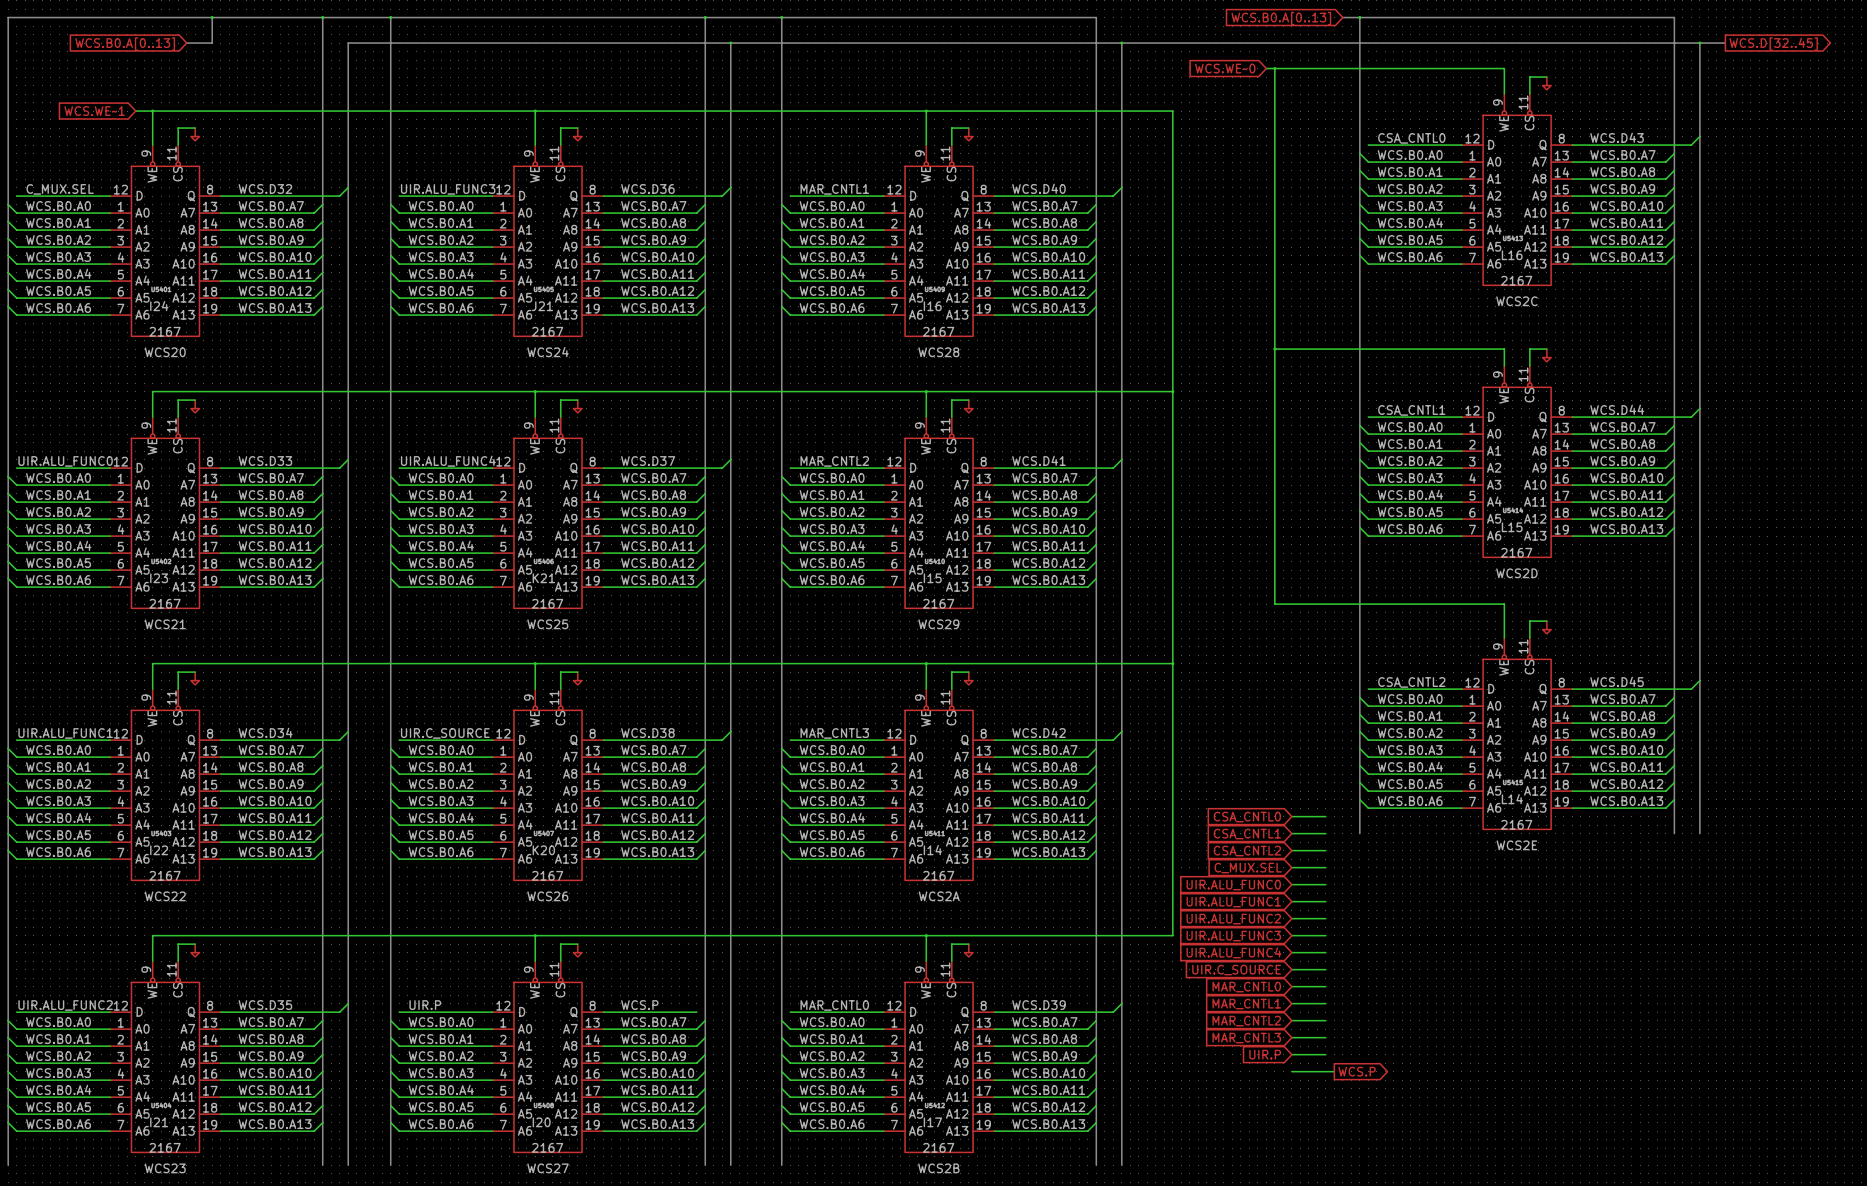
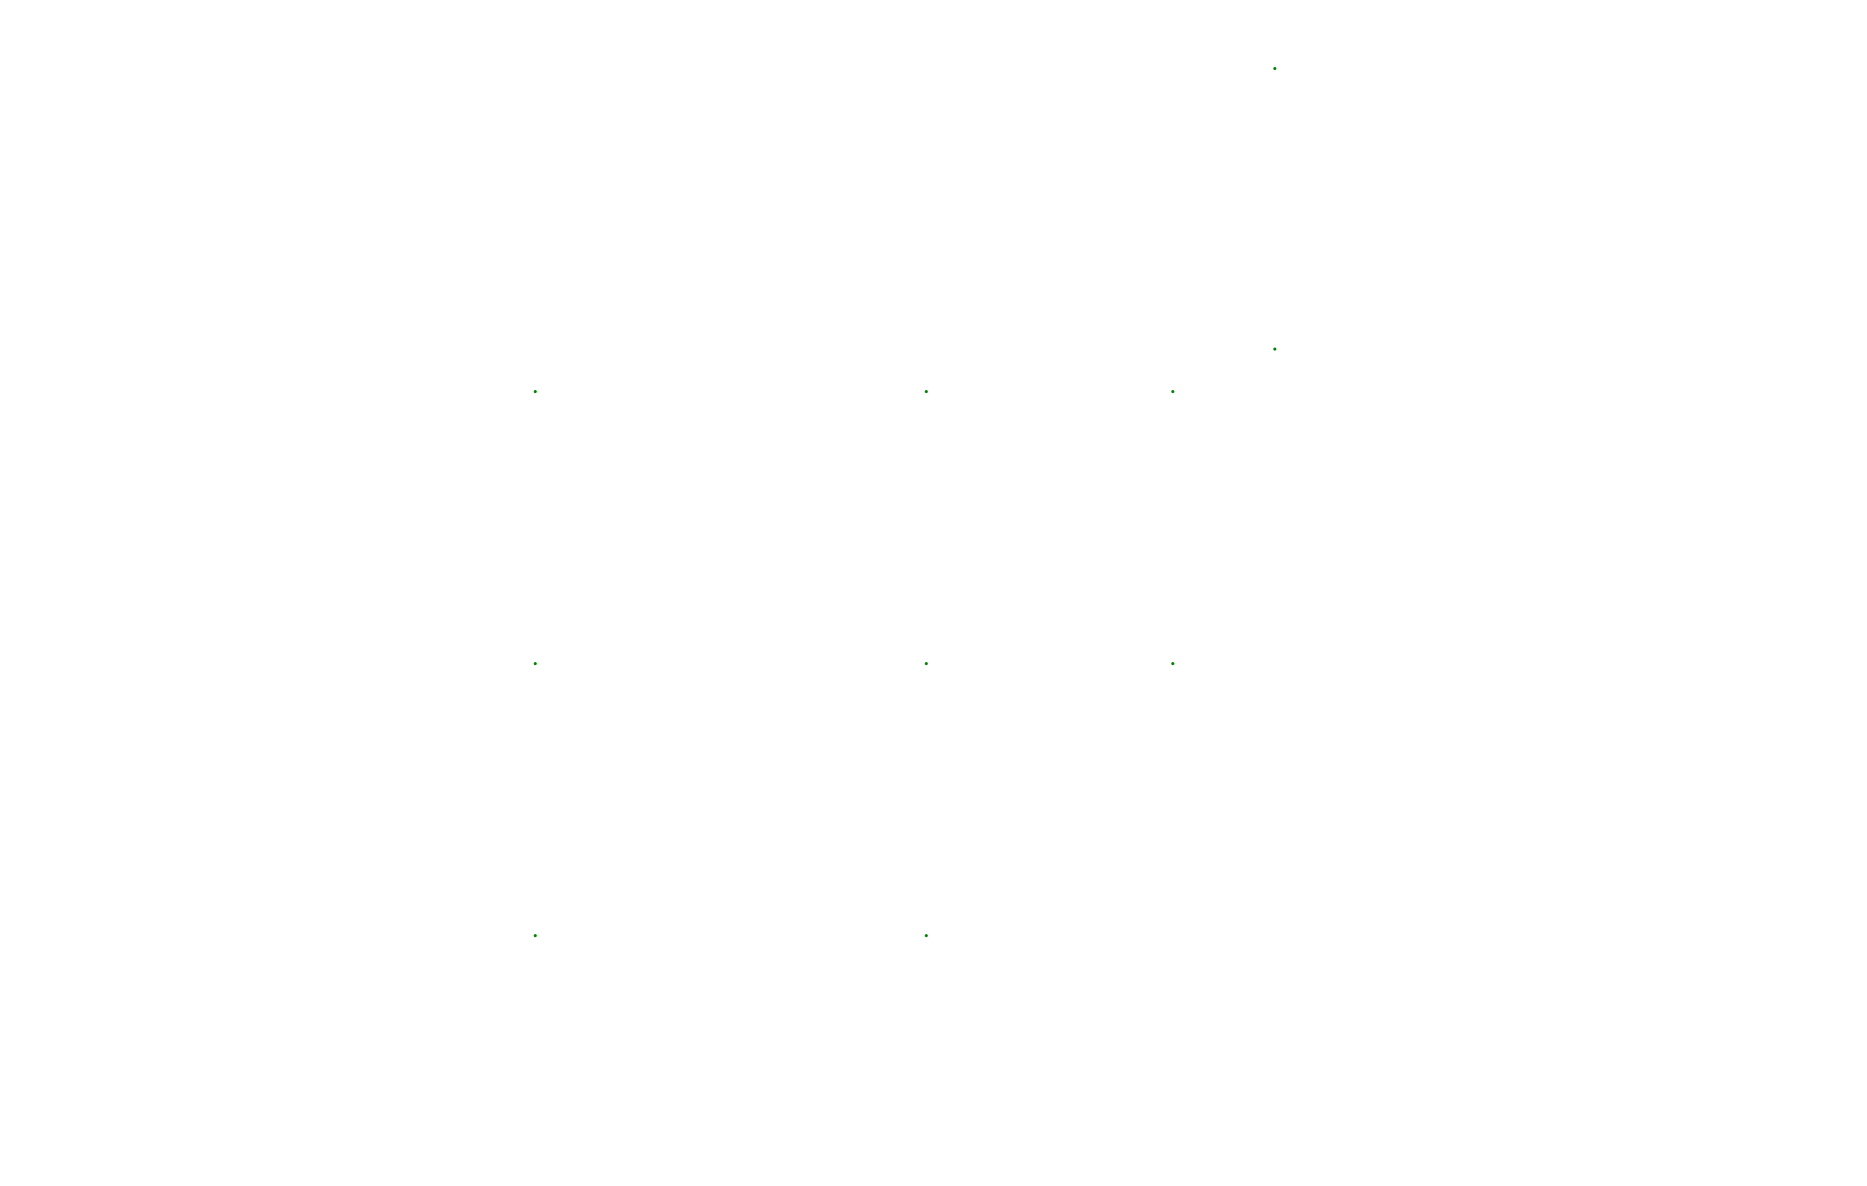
bus: (212, 17) (212, 43) (186, 43) -> none
junction: (212, 17) -> none
bus: (322, 17) (322, 1165) -> none
junction: (322, 17) -> none
bus: (390, 17) (390, 1165) -> none
junction: (390, 17) -> none
bus: (705, 17) (705, 1165) -> none
junction: (705, 17) -> none
bus: (781, 17) (781, 1165) -> none
junction: (781, 17) -> none
bus: (1342, 17) (1674, 17) (1674, 833) -> none
bus: (1359, 17) (1359, 833) -> none
junction: (1359, 17) -> none
global label: WCS.B0.A[0..13] (1281, 18) -> none
bus: (730, 43) (730, 1165) -> none
junction: (730, 43) -> none
bus: (1121, 43) (1121, 1165) -> none
junction: (1121, 43) -> none
bus: (1699, 43) (1699, 833) -> none
junction: (1699, 43) -> none
bus: (1725, 43) (348, 43) (348, 1165) -> none
global label: WCS.B0.A[0..13] (125, 44) -> none
global label: WCS.D[32..45] (1773, 44) -> none
global label: WCS.WE~0 (1225, 68) -> none
wire: (1266, 68) (1504, 68) (1504, 94) -> none
wire: (1274, 68) (1274, 604) (1504, 604) (1504, 638) -> none
wire: (1546, 77) (1529, 77) (1529, 94) -> none
power symbol: (1546, 83) -> none
global label: WCS.WE~1 (94, 111) -> none
wire: (135, 111) (1172, 111) (1172, 935) (152, 935) (152, 961) -> none
wire: (152, 111) (152, 145) -> none
wire: (535, 111) (535, 145) -> none
wire: (926, 111) (926, 145) -> none
wire: (195, 128) (178, 128) (178, 145) -> none
wire: (577, 128) (560, 128) (560, 145) -> none
wire: (968, 128) (951, 128) (951, 145) -> none
power symbol: (195, 134) -> none
power symbol: (577, 134) -> none
power symbol: (968, 134) -> none
wire: (1699, 136) (1691, 145) (1572, 145) -> none
label: WCS.D43 (1617, 137) -> none
label: CSA_CNTL0 (1411, 138) -> none
wire: (1368, 145) (1461, 145) -> none
wire: (1359, 153) (1368, 162) (1461, 162) -> none
wire: (1674, 153) (1665, 162) (1572, 162) -> none
label: WCS.B0.A0 (1410, 154) -> none
label: WCS.B0.A7 (1622, 154) -> none
wire: (1359, 170) (1368, 179) (1461, 179) -> none
wire: (1674, 170) (1665, 179) (1572, 179) -> none
label: WCS.B0.A1 (1410, 171) -> none
label: WCS.B0.A8 (1622, 171) -> none
wire: (348, 187) (339, 196) (220, 196) -> none
wire: (730, 187) (722, 196) (603, 196) -> none
wire: (1121, 187) (1113, 196) (994, 196) -> none
wire: (1359, 187) (1368, 196) (1461, 196) -> none
wire: (1674, 187) (1665, 196) (1572, 196) -> none
label: WCS.D32 (265, 188) -> none
label: WCS.D36 (647, 188) -> none
label: WCS.D40 (1038, 188) -> none
label: WCS.B0.A2 (1410, 188) -> none
label: WCS.B0.A9 (1622, 188) -> none
label: C_MUX.SEL (60, 189) -> none
label: UIR.ALU_FUNC3 (448, 189) -> none
label: MAR_CNTL1 (834, 189) -> none
part: 2167 (1517, 189) -> none
wire: (16, 196) (110, 196) -> none
wire: (399, 196) (492, 196) -> none
wire: (790, 196) (883, 196) -> none
wire: (8, 204) (16, 213) (110, 213) -> none
wire: (322, 204) (314, 213) (220, 213) -> none
wire: (390, 204) (399, 213) (492, 213) -> none
wire: (705, 204) (696, 213) (603, 213) -> none
wire: (781, 204) (790, 213) (883, 213) -> none
wire: (1096, 204) (1087, 213) (994, 213) -> none
wire: (1359, 204) (1368, 213) (1461, 213) -> none
wire: (1674, 204) (1665, 213) (1572, 213) -> none
label: WCS.B0.A0 (58, 205) -> none
label: WCS.B0.A7 (271, 205) -> none
label: WCS.B0.A0 (441, 205) -> none
label: WCS.B0.A7 (653, 205) -> none
label: WCS.B0.A0 (832, 205) -> none
label: WCS.B0.A7 (1044, 205) -> none
label: WCS.B0.A3 (1410, 205) -> none
label: WCS.B0.A10 (1626, 205) -> none
wire: (8, 221) (16, 230) (110, 230) -> none
wire: (322, 221) (314, 230) (220, 230) -> none
wire: (390, 221) (399, 230) (492, 230) -> none
wire: (705, 221) (696, 230) (603, 230) -> none
wire: (781, 221) (790, 230) (883, 230) -> none
wire: (1096, 221) (1087, 230) (994, 230) -> none
wire: (1359, 221) (1368, 230) (1461, 230) -> none
wire: (1674, 221) (1665, 230) (1572, 230) -> none
label: WCS.B0.A1 (58, 222) -> none
label: WCS.B0.A8 (271, 222) -> none
label: WCS.B0.A1 (441, 222) -> none
label: WCS.B0.A8 (653, 222) -> none
label: WCS.B0.A1 (832, 222) -> none
label: WCS.B0.A8 (1044, 222) -> none
label: WCS.B0.A4 (1410, 222) -> none
label: WCS.B0.A11 (1626, 222) -> none
wire: (8, 238) (16, 247) (110, 247) -> none
wire: (322, 238) (314, 247) (220, 247) -> none
wire: (390, 238) (399, 247) (492, 247) -> none
wire: (705, 238) (696, 247) (603, 247) -> none
wire: (781, 238) (790, 247) (883, 247) -> none
wire: (1096, 238) (1087, 247) (994, 247) -> none
wire: (1359, 238) (1368, 247) (1461, 247) -> none
wire: (1674, 238) (1665, 247) (1572, 247) -> none
label: WCS.B0.A2 (58, 239) -> none
label: WCS.B0.A9 (271, 239) -> none
label: WCS.B0.A2 (441, 239) -> none
label: WCS.B0.A9 (653, 239) -> none
label: WCS.B0.A2 (832, 239) -> none
label: WCS.B0.A9 (1044, 239) -> none
label: WCS.B0.A5 (1410, 239) -> none
label: WCS.B0.A12 (1626, 239) -> none
part: 2167 (165, 240) -> none
part: 2167 (548, 240) -> none
part: 2167 (939, 240) -> none
wire: (8, 255) (16, 264) (110, 264) -> none
wire: (322, 255) (314, 264) (220, 264) -> none
wire: (390, 255) (399, 264) (492, 264) -> none
wire: (705, 255) (696, 264) (603, 264) -> none
wire: (781, 255) (790, 264) (883, 264) -> none
wire: (1096, 255) (1087, 264) (994, 264) -> none
wire: (1359, 255) (1368, 264) (1461, 264) -> none
wire: (1674, 255) (1665, 264) (1572, 264) -> none
label: WCS.B0.A3 (58, 256) -> none
label: WCS.B0.A10 (275, 256) -> none
label: WCS.B0.A3 (441, 256) -> none
label: WCS.B0.A10 (657, 256) -> none
label: WCS.B0.A3 (832, 256) -> none
label: WCS.B0.A10 (1048, 256) -> none
label: WCS.B0.A6 (1410, 256) -> none
label: WCS.B0.A13 (1626, 256) -> none
wire: (8, 272) (16, 281) (110, 281) -> none
wire: (322, 272) (314, 281) (220, 281) -> none
wire: (390, 272) (399, 281) (492, 281) -> none
wire: (705, 272) (696, 281) (603, 281) -> none
wire: (781, 272) (790, 281) (883, 281) -> none
wire: (1096, 272) (1087, 281) (994, 281) -> none
label: WCS.B0.A4 (58, 273) -> none
label: WCS.B0.A11 (275, 273) -> none
label: WCS.B0.A4 (441, 273) -> none
label: WCS.B0.A11 (657, 273) -> none
label: WCS.B0.A4 (832, 273) -> none
label: WCS.B0.A11 (1048, 273) -> none
wire: (8, 289) (16, 298) (110, 298) -> none
wire: (322, 289) (314, 298) (220, 298) -> none
wire: (390, 289) (399, 298) (492, 298) -> none
wire: (705, 289) (696, 298) (603, 298) -> none
wire: (781, 289) (790, 298) (883, 298) -> none
wire: (1096, 289) (1087, 298) (994, 298) -> none
label: WCS.B0.A5 (58, 290) -> none
label: WCS.B0.A12 (275, 290) -> none
label: WCS.B0.A5 (441, 290) -> none
label: WCS.B0.A12 (657, 290) -> none
label: WCS.B0.A5 (832, 290) -> none
label: WCS.B0.A12 (1048, 290) -> none
wire: (8, 306) (16, 315) (110, 315) -> none
wire: (322, 306) (314, 315) (220, 315) -> none
wire: (390, 306) (399, 315) (492, 315) -> none
wire: (705, 306) (696, 315) (603, 315) -> none
wire: (781, 306) (790, 315) (883, 315) -> none
wire: (1096, 306) (1087, 315) (994, 315) -> none
label: WCS.B0.A6 (58, 308) -> none
label: WCS.B0.A13 (275, 308) -> none
label: WCS.B0.A6 (441, 308) -> none
label: WCS.B0.A13 (657, 308) -> none
label: WCS.B0.A6 (832, 308) -> none
label: WCS.B0.A13 (1048, 308) -> none
wire: (1274, 349) (1504, 349) (1504, 366) -> none
wire: (1546, 349) (1529, 349) (1529, 366) -> none
power symbol: (1546, 355) -> none
wire: (535, 391) (535, 417) -> none
wire: (926, 391) (926, 417) -> none
wire: (1172, 391) (152, 391) (152, 417) -> none
wire: (195, 400) (178, 400) (178, 417) -> none
wire: (577, 400) (560, 400) (560, 417) -> none
wire: (968, 400) (951, 400) (951, 417) -> none
power symbol: (195, 406) -> none
power symbol: (577, 406) -> none
power symbol: (968, 406) -> none
wire: (1699, 408) (1691, 417) (1572, 417) -> none
label: WCS.D44 (1617, 409) -> none
label: CSA_CNTL1 (1411, 410) -> none
wire: (1368, 417) (1461, 417) -> none
wire: (1359, 425) (1368, 434) (1461, 434) -> none
wire: (1674, 425) (1665, 434) (1572, 434) -> none
label: WCS.B0.A0 (1410, 427) -> none
label: WCS.B0.A7 (1622, 427) -> none
wire: (1359, 442) (1368, 451) (1461, 451) -> none
wire: (1674, 442) (1665, 451) (1572, 451) -> none
label: WCS.B0.A1 (1410, 444) -> none
label: WCS.B0.A8 (1622, 444) -> none
wire: (348, 459) (339, 468) (220, 468) -> none
wire: (730, 459) (722, 468) (603, 468) -> none
wire: (1121, 459) (1113, 468) (994, 468) -> none
wire: (1359, 459) (1368, 468) (1461, 468) -> none
wire: (1674, 459) (1665, 468) (1572, 468) -> none
label: WCS.D41 (1038, 460) -> none
label: UIR.ALU_FUNC0 (65, 461) -> none
label: WCS.D33 (265, 461) -> none
label: UIR.ALU_FUNC4 (448, 461) -> none
label: WCS.D37 (648, 461) -> none
label: MAR_CNTL2 (834, 461) -> none
label: WCS.B0.A2 (1410, 461) -> none
part: 2167 (1517, 461) -> none
label: WCS.B0.A9 (1622, 461) -> none
wire: (16, 468) (110, 468) -> none
wire: (399, 468) (492, 468) -> none
wire: (790, 468) (883, 468) -> none
wire: (8, 476) (16, 485) (110, 485) -> none
wire: (322, 476) (314, 485) (220, 485) -> none
wire: (390, 476) (399, 485) (492, 485) -> none
wire: (705, 476) (696, 485) (603, 485) -> none
wire: (781, 476) (790, 485) (883, 485) -> none
wire: (1096, 476) (1087, 485) (994, 485) -> none
wire: (1359, 476) (1368, 485) (1461, 485) -> none
wire: (1674, 476) (1665, 485) (1572, 485) -> none
label: WCS.B0.A0 (58, 478) -> none
label: WCS.B0.A7 (271, 478) -> none
label: WCS.B0.A0 (441, 478) -> none
label: WCS.B0.A7 (653, 478) -> none
label: WCS.B0.A0 (832, 478) -> none
label: WCS.B0.A7 (1044, 478) -> none
label: WCS.B0.A3 (1410, 478) -> none
label: WCS.B0.A10 (1626, 478) -> none
wire: (8, 493) (16, 502) (110, 502) -> none
wire: (322, 493) (314, 502) (220, 502) -> none
wire: (390, 493) (399, 502) (492, 502) -> none
wire: (705, 493) (696, 502) (603, 502) -> none
wire: (781, 493) (790, 502) (883, 502) -> none
wire: (1096, 493) (1087, 502) (994, 502) -> none
wire: (1359, 493) (1368, 502) (1461, 502) -> none
wire: (1674, 493) (1665, 502) (1572, 502) -> none
label: WCS.B0.A4 (1410, 494) -> none
label: WCS.B0.A1 (58, 495) -> none
label: WCS.B0.A8 (271, 495) -> none
label: WCS.B0.A1 (441, 495) -> none
label: WCS.B0.A8 (653, 495) -> none
label: WCS.B0.A1 (832, 495) -> none
label: WCS.B0.A8 (1044, 495) -> none
label: WCS.B0.A11 (1626, 495) -> none
wire: (8, 510) (16, 519) (110, 519) -> none
wire: (322, 510) (314, 519) (220, 519) -> none
wire: (390, 510) (399, 519) (492, 519) -> none
wire: (705, 510) (696, 519) (603, 519) -> none
wire: (781, 510) (790, 519) (883, 519) -> none
wire: (1096, 510) (1087, 519) (994, 519) -> none
wire: (1359, 510) (1368, 519) (1461, 519) -> none
wire: (1674, 510) (1665, 519) (1572, 519) -> none
label: WCS.B0.A2 (58, 512) -> none
part: 2167 (165, 512) -> none
label: WCS.B0.A9 (271, 512) -> none
label: WCS.B0.A2 (441, 512) -> none
part: 2167 (548, 512) -> none
label: WCS.B0.A9 (653, 512) -> none
label: WCS.B0.A2 (832, 512) -> none
part: 2167 (939, 512) -> none
label: WCS.B0.A9 (1044, 512) -> none
label: WCS.B0.A5 (1410, 512) -> none
label: WCS.B0.A12 (1626, 512) -> none
wire: (8, 527) (16, 536) (110, 536) -> none
wire: (322, 527) (314, 536) (220, 536) -> none
wire: (390, 527) (399, 536) (492, 536) -> none
wire: (705, 527) (696, 536) (603, 536) -> none
wire: (781, 527) (790, 536) (883, 536) -> none
wire: (1096, 527) (1087, 536) (994, 536) -> none
wire: (1359, 527) (1368, 536) (1461, 536) -> none
wire: (1674, 527) (1665, 536) (1572, 536) -> none
label: WCS.B0.A3 (58, 529) -> none
label: WCS.B0.A10 (275, 529) -> none
label: WCS.B0.A3 (441, 529) -> none
label: WCS.B0.A10 (657, 529) -> none
label: WCS.B0.A3 (832, 529) -> none
label: WCS.B0.A10 (1048, 529) -> none
label: WCS.B0.A6 (1410, 529) -> none
label: WCS.B0.A13 (1626, 529) -> none
wire: (8, 544) (16, 553) (110, 553) -> none
wire: (322, 544) (314, 553) (220, 553) -> none
wire: (390, 544) (399, 553) (492, 553) -> none
wire: (705, 544) (696, 553) (603, 553) -> none
wire: (781, 544) (790, 553) (883, 553) -> none
wire: (1096, 544) (1087, 553) (994, 553) -> none
label: WCS.B0.A4 (58, 545) -> none
label: WCS.B0.A4 (441, 545) -> none
label: WCS.B0.A4 (832, 545) -> none
label: WCS.B0.A11 (275, 546) -> none
label: WCS.B0.A11 (657, 546) -> none
label: WCS.B0.A11 (1048, 546) -> none
wire: (8, 561) (16, 570) (110, 570) -> none
wire: (322, 561) (314, 570) (220, 570) -> none
wire: (390, 561) (399, 570) (492, 570) -> none
wire: (705, 561) (696, 570) (603, 570) -> none
wire: (781, 561) (790, 570) (883, 570) -> none
wire: (1096, 561) (1087, 570) (994, 570) -> none
label: WCS.B0.A5 (58, 563) -> none
label: WCS.B0.A12 (275, 563) -> none
label: WCS.B0.A5 (441, 563) -> none
label: WCS.B0.A12 (657, 563) -> none
label: WCS.B0.A5 (832, 563) -> none
label: WCS.B0.A12 (1048, 563) -> none
wire: (8, 578) (16, 587) (110, 587) -> none
wire: (322, 578) (314, 587) (220, 587) -> none
wire: (390, 578) (399, 587) (492, 587) -> none
wire: (705, 578) (696, 587) (603, 587) -> none
wire: (781, 578) (790, 587) (883, 587) -> none
wire: (1096, 578) (1087, 587) (994, 587) -> none
label: WCS.B0.A6 (58, 580) -> none
label: WCS.B0.A13 (275, 580) -> none
label: WCS.B0.A6 (441, 580) -> none
label: WCS.B0.A13 (657, 580) -> none
label: WCS.B0.A6 (832, 580) -> none
label: WCS.B0.A13 (1048, 580) -> none
wire: (1546, 621) (1529, 621) (1529, 638) -> none
power symbol: (1546, 627) -> none
wire: (535, 663) (535, 689) -> none
wire: (926, 663) (926, 689) -> none
wire: (1172, 663) (152, 663) (152, 689) -> none
wire: (195, 672) (178, 672) (178, 689) -> none
wire: (577, 672) (560, 672) (560, 689) -> none
wire: (968, 672) (951, 672) (951, 689) -> none
power symbol: (195, 678) -> none
power symbol: (577, 678) -> none
power symbol: (968, 678) -> none
wire: (1699, 680) (1691, 689) (1572, 689) -> none
label: WCS.D45 (1617, 681) -> none
label: CSA_CNTL2 (1411, 682) -> none
wire: (1368, 689) (1461, 689) -> none
wire: (1359, 697) (1368, 706) (1461, 706) -> none
wire: (1674, 697) (1665, 706) (1572, 706) -> none
label: WCS.B0.A0 (1410, 699) -> none
label: WCS.B0.A7 (1622, 699) -> none
wire: (1359, 714) (1368, 723) (1461, 723) -> none
wire: (1674, 714) (1665, 723) (1572, 723) -> none
label: WCS.B0.A1 (1410, 716) -> none
label: WCS.B0.A8 (1622, 716) -> none
wire: (348, 731) (339, 740) (220, 740) -> none
wire: (730, 731) (722, 740) (603, 740) -> none
wire: (1121, 731) (1113, 740) (994, 740) -> none
wire: (1359, 731) (1368, 740) (1461, 740) -> none
wire: (1674, 731) (1665, 740) (1572, 740) -> none
label: WCS.D34 (265, 732) -> none
label: WCS.D42 (1038, 732) -> none
label: UIR.ALU_FUNC1 (65, 733) -> none
label: UIR.C_SOURCE (445, 733) -> none
label: WCS.D38 (647, 733) -> none
label: MAR_CNTL3 (834, 733) -> none
label: WCS.B0.A2 (1410, 733) -> none
part: 2167 (1517, 733) -> none
label: WCS.B0.A9 (1622, 733) -> none
wire: (16, 740) (110, 740) -> none
wire: (399, 740) (492, 740) -> none
wire: (790, 740) (883, 740) -> none
wire: (8, 748) (16, 757) (110, 757) -> none
wire: (322, 748) (314, 757) (220, 757) -> none
wire: (390, 748) (399, 757) (492, 757) -> none
wire: (705, 748) (696, 757) (603, 757) -> none
wire: (781, 748) (790, 757) (883, 757) -> none
wire: (1096, 748) (1087, 757) (994, 757) -> none
wire: (1359, 748) (1368, 757) (1461, 757) -> none
wire: (1674, 748) (1665, 757) (1572, 757) -> none
label: WCS.B0.A0 (58, 750) -> none
label: WCS.B0.A7 (271, 750) -> none
label: WCS.B0.A0 (441, 750) -> none
label: WCS.B0.A7 (653, 750) -> none
label: WCS.B0.A0 (832, 750) -> none
label: WCS.B0.A7 (1044, 750) -> none
label: WCS.B0.A3 (1410, 750) -> none
label: WCS.B0.A10 (1626, 750) -> none
wire: (8, 765) (16, 774) (110, 774) -> none
wire: (322, 765) (314, 774) (220, 774) -> none
wire: (390, 765) (399, 774) (492, 774) -> none
wire: (705, 765) (696, 774) (603, 774) -> none
wire: (781, 765) (790, 774) (883, 774) -> none
wire: (1096, 765) (1087, 774) (994, 774) -> none
wire: (1359, 765) (1368, 774) (1461, 774) -> none
wire: (1674, 765) (1665, 774) (1572, 774) -> none
label: WCS.B0.A4 (1410, 766) -> none
label: WCS.B0.A1 (58, 767) -> none
label: WCS.B0.A8 (271, 767) -> none
label: WCS.B0.A1 (441, 767) -> none
label: WCS.B0.A8 (653, 767) -> none
label: WCS.B0.A1 (832, 767) -> none
label: WCS.B0.A8 (1044, 767) -> none
label: WCS.B0.A11 (1626, 767) -> none
wire: (8, 782) (16, 791) (110, 791) -> none
wire: (322, 782) (314, 791) (220, 791) -> none
wire: (390, 782) (399, 791) (492, 791) -> none
wire: (705, 782) (696, 791) (603, 791) -> none
wire: (781, 782) (790, 791) (883, 791) -> none
wire: (1096, 782) (1087, 791) (994, 791) -> none
wire: (1359, 782) (1368, 791) (1461, 791) -> none
wire: (1674, 782) (1665, 791) (1572, 791) -> none
label: WCS.B0.A2 (58, 784) -> none
part: 2167 (165, 784) -> none
label: WCS.B0.A9 (271, 784) -> none
label: WCS.B0.A2 (441, 784) -> none
part: 2167 (548, 784) -> none
label: WCS.B0.A9 (653, 784) -> none
label: WCS.B0.A2 (832, 784) -> none
part: 2167 (939, 784) -> none
label: WCS.B0.A9 (1044, 784) -> none
label: WCS.B0.A5 (1410, 784) -> none
label: WCS.B0.A12 (1626, 784) -> none
wire: (8, 799) (16, 808) (110, 808) -> none
wire: (322, 799) (314, 808) (220, 808) -> none
wire: (390, 799) (399, 808) (492, 808) -> none
wire: (705, 799) (696, 808) (603, 808) -> none
wire: (781, 799) (790, 808) (883, 808) -> none
wire: (1096, 799) (1087, 808) (994, 808) -> none
wire: (1359, 799) (1368, 808) (1461, 808) -> none
wire: (1674, 799) (1665, 808) (1572, 808) -> none
label: WCS.B0.A3 (58, 801) -> none
label: WCS.B0.A10 (275, 801) -> none
label: WCS.B0.A3 (441, 801) -> none
label: WCS.B0.A10 (657, 801) -> none
label: WCS.B0.A3 (832, 801) -> none
label: WCS.B0.A10 (1048, 801) -> none
label: WCS.B0.A6 (1410, 801) -> none
label: WCS.B0.A13 (1626, 801) -> none
wire: (8, 816) (16, 825) (110, 825) -> none
wire: (322, 816) (314, 825) (220, 825) -> none
wire: (390, 816) (399, 825) (492, 825) -> none
wire: (705, 816) (696, 825) (603, 825) -> none
wire: (781, 816) (790, 825) (883, 825) -> none
wire: (1096, 816) (1087, 825) (994, 825) -> none
wire: (1291, 816) (1325, 816) -> none
label: WCS.B0.A4 (58, 817) -> none
label: WCS.B0.A4 (441, 817) -> none
label: WCS.B0.A4 (832, 817) -> none
global label: CSA_CNTL0 (1247, 817) -> none
label: WCS.B0.A11 (275, 818) -> none
label: WCS.B0.A11 (657, 818) -> none
label: WCS.B0.A11 (1048, 818) -> none
wire: (8, 833) (16, 842) (110, 842) -> none
wire: (322, 833) (314, 842) (220, 842) -> none
wire: (390, 833) (399, 842) (492, 842) -> none
wire: (705, 833) (696, 842) (603, 842) -> none
wire: (781, 833) (790, 842) (883, 842) -> none
wire: (1096, 833) (1087, 842) (994, 842) -> none
wire: (1291, 833) (1325, 833) -> none
global label: CSA_CNTL1 (1247, 834) -> none
label: WCS.B0.A5 (58, 835) -> none
label: WCS.B0.A12 (275, 835) -> none
label: WCS.B0.A5 (441, 835) -> none
label: WCS.B0.A12 (657, 835) -> none
label: WCS.B0.A5 (832, 835) -> none
label: WCS.B0.A12 (1048, 835) -> none
wire: (8, 850) (16, 859) (110, 859) -> none
wire: (322, 850) (314, 859) (220, 859) -> none
wire: (390, 850) (399, 859) (492, 859) -> none
wire: (705, 850) (696, 859) (603, 859) -> none
wire: (781, 850) (790, 859) (883, 859) -> none
wire: (1096, 850) (1087, 859) (994, 859) -> none
wire: (1291, 850) (1325, 850) -> none
global label: CSA_CNTL2 (1247, 851) -> none
label: WCS.B0.A6 (58, 852) -> none
label: WCS.B0.A13 (275, 852) -> none
label: WCS.B0.A6 (441, 852) -> none
label: WCS.B0.A13 (657, 852) -> none
label: WCS.B0.A6 (832, 852) -> none
label: WCS.B0.A13 (1048, 852) -> none
wire: (1291, 867) (1325, 867) -> none
global label: C_MUX.SEL (1248, 868) -> none
wire: (1291, 884) (1325, 884) -> none
global label: UIR.ALU_FUNC0 (1233, 885) -> none
wire: (1291, 901) (1325, 901) -> none
global label: UIR.ALU_FUNC1 (1233, 902) -> none
wire: (1291, 918) (1325, 918) -> none
global label: UIR.ALU_FUNC2 (1233, 919) -> none
wire: (535, 935) (535, 961) -> none
wire: (926, 935) (926, 961) -> none
wire: (1291, 935) (1325, 935) -> none
global label: UIR.ALU_FUNC3 (1233, 936) -> none
wire: (195, 944) (178, 944) (178, 961) -> none
wire: (577, 944) (560, 944) (560, 961) -> none
wire: (968, 944) (951, 944) (951, 961) -> none
power symbol: (195, 950) -> none
power symbol: (577, 950) -> none
power symbol: (968, 950) -> none
global label: UIR.ALU_FUNC4 (1233, 952) -> none
wire: (1291, 952) (1325, 952) -> none
wire: (1291, 969) (1325, 969) -> none
global label: UIR.C_SOURCE (1236, 970) -> none
wire: (1291, 986) (1325, 986) -> none
global label: MAR_CNTL0 (1246, 987) -> none
wire: (348, 1003) (339, 1012) (220, 1012) -> none
wire: (1121, 1003) (1113, 1012) (994, 1012) -> none
wire: (1291, 1003) (1325, 1003) -> none
global label: MAR_CNTL1 (1246, 1004) -> none
label: UIR.ALU_FUNC2 (65, 1005) -> none
label: WCS.D35 (265, 1005) -> none
label: UIR.P (425, 1005) -> none
label: WCS.P (639, 1005) -> none
label: MAR_CNTL0 (834, 1005) -> none
label: WCS.D39 (1038, 1005) -> none
wire: (16, 1012) (110, 1012) -> none
wire: (399, 1012) (492, 1012) -> none
wire: (603, 1012) (696, 1012) -> none
wire: (790, 1012) (883, 1012) -> none
wire: (8, 1020) (16, 1029) (110, 1029) -> none
wire: (322, 1020) (314, 1029) (220, 1029) -> none
wire: (390, 1020) (399, 1029) (492, 1029) -> none
wire: (705, 1020) (696, 1029) (603, 1029) -> none
wire: (781, 1020) (790, 1029) (883, 1029) -> none
wire: (1096, 1020) (1087, 1029) (994, 1029) -> none
wire: (1291, 1020) (1325, 1020) -> none
global label: MAR_CNTL2 (1246, 1021) -> none
label: WCS.B0.A0 (58, 1022) -> none
label: WCS.B0.A7 (271, 1022) -> none
label: WCS.B0.A0 (441, 1022) -> none
label: WCS.B0.A7 (653, 1022) -> none
label: WCS.B0.A0 (832, 1022) -> none
label: WCS.B0.A7 (1044, 1022) -> none
wire: (8, 1037) (16, 1046) (110, 1046) -> none
wire: (322, 1037) (314, 1046) (220, 1046) -> none
wire: (390, 1037) (399, 1046) (492, 1046) -> none
wire: (705, 1037) (696, 1046) (603, 1046) -> none
wire: (781, 1037) (790, 1046) (883, 1046) -> none
wire: (1096, 1037) (1087, 1046) (994, 1046) -> none
wire: (1291, 1037) (1325, 1037) -> none
global label: MAR_CNTL3 (1246, 1038) -> none
label: WCS.B0.A1 (58, 1039) -> none
label: WCS.B0.A8 (271, 1039) -> none
label: WCS.B0.A1 (441, 1039) -> none
label: WCS.B0.A8 (653, 1039) -> none
label: WCS.B0.A1 (832, 1039) -> none
label: WCS.B0.A8 (1044, 1039) -> none
wire: (8, 1054) (16, 1063) (110, 1063) -> none
wire: (322, 1054) (314, 1063) (220, 1063) -> none
wire: (390, 1054) (399, 1063) (492, 1063) -> none
wire: (705, 1054) (696, 1063) (603, 1063) -> none
wire: (781, 1054) (790, 1063) (883, 1063) -> none
wire: (1096, 1054) (1087, 1063) (994, 1063) -> none
global label: UIR.P (1265, 1054) -> none
wire: (1291, 1054) (1325, 1054) -> none
label: WCS.B0.A2 (58, 1056) -> none
part: 2167 (165, 1056) -> none
label: WCS.B0.A9 (271, 1056) -> none
label: WCS.B0.A2 (441, 1056) -> none
part: 2167 (548, 1056) -> none
label: WCS.B0.A9 (653, 1056) -> none
label: WCS.B0.A2 (832, 1056) -> none
part: 2167 (939, 1056) -> none
label: WCS.B0.A9 (1044, 1056) -> none
wire: (8, 1071) (16, 1080) (110, 1080) -> none
wire: (322, 1071) (314, 1080) (220, 1080) -> none
wire: (390, 1071) (399, 1080) (492, 1080) -> none
wire: (705, 1071) (696, 1080) (603, 1080) -> none
wire: (781, 1071) (790, 1080) (883, 1080) -> none
wire: (1096, 1071) (1087, 1080) (994, 1080) -> none
wire: (1291, 1071) (1334, 1071) -> none
global label: WCS.P (1357, 1071) -> none
label: WCS.B0.A3 (58, 1073) -> none
label: WCS.B0.A10 (275, 1073) -> none
label: WCS.B0.A3 (441, 1073) -> none
label: WCS.B0.A10 (657, 1073) -> none
label: WCS.B0.A3 (832, 1073) -> none
label: WCS.B0.A10 (1048, 1073) -> none
wire: (8, 1088) (16, 1097) (110, 1097) -> none
wire: (322, 1088) (314, 1097) (220, 1097) -> none
wire: (390, 1088) (399, 1097) (492, 1097) -> none
wire: (705, 1088) (696, 1097) (603, 1097) -> none
wire: (781, 1088) (790, 1097) (883, 1097) -> none
wire: (1096, 1088) (1087, 1097) (994, 1097) -> none
label: WCS.B0.A4 (58, 1089) -> none
label: WCS.B0.A4 (441, 1089) -> none
label: WCS.B0.A4 (832, 1089) -> none
label: WCS.B0.A11 (275, 1090) -> none
label: WCS.B0.A11 (657, 1090) -> none
label: WCS.B0.A11 (1048, 1090) -> none
wire: (8, 1105) (16, 1114) (110, 1114) -> none
wire: (322, 1105) (314, 1114) (220, 1114) -> none
wire: (390, 1105) (399, 1114) (492, 1114) -> none
wire: (705, 1105) (696, 1114) (603, 1114) -> none
wire: (781, 1105) (790, 1114) (883, 1114) -> none
wire: (1096, 1105) (1087, 1114) (994, 1114) -> none
label: WCS.B0.A5 (58, 1107) -> none
label: WCS.B0.A12 (275, 1107) -> none
label: WCS.B0.A5 (441, 1107) -> none
label: WCS.B0.A12 (657, 1107) -> none
label: WCS.B0.A5 (832, 1107) -> none
label: WCS.B0.A12 (1048, 1107) -> none
wire: (8, 1122) (16, 1131) (110, 1131) -> none
wire: (322, 1122) (314, 1131) (220, 1131) -> none
wire: (390, 1122) (399, 1131) (492, 1131) -> none
wire: (705, 1122) (696, 1131) (603, 1131) -> none
wire: (781, 1122) (790, 1131) (883, 1131) -> none
wire: (1096, 1122) (1087, 1131) (994, 1131) -> none
label: WCS.B0.A6 (58, 1124) -> none
label: WCS.B0.A13 (275, 1124) -> none
label: WCS.B0.A6 (441, 1124) -> none
label: WCS.B0.A13 (657, 1124) -> none
label: WCS.B0.A6 (832, 1124) -> none
label: WCS.B0.A13 (1048, 1124) -> none
bus: (8, 1165) (8, 17) (1096, 17) (1096, 1165) -> none

